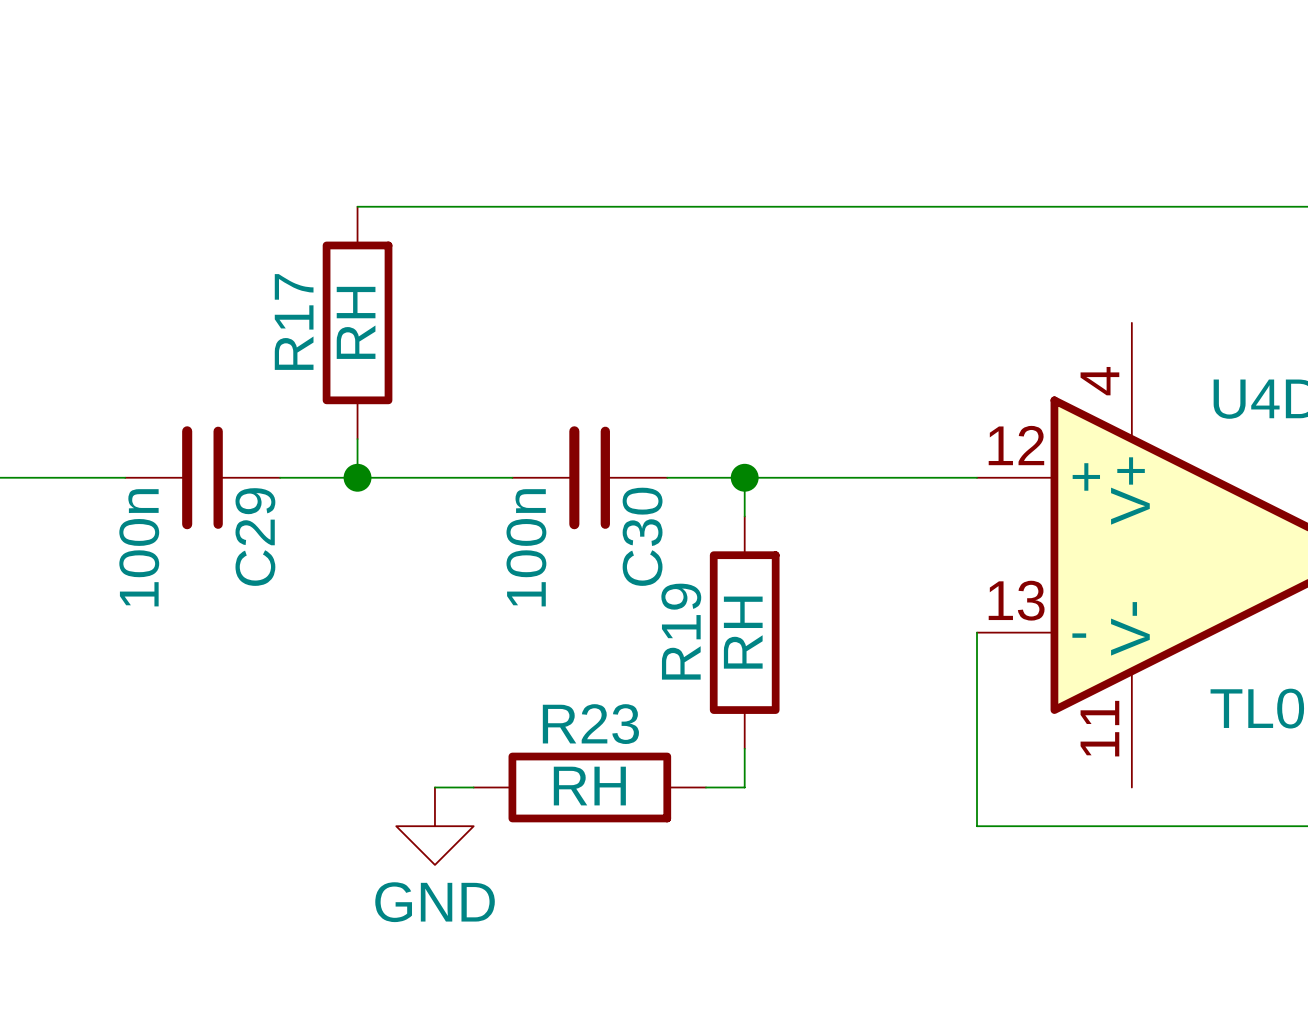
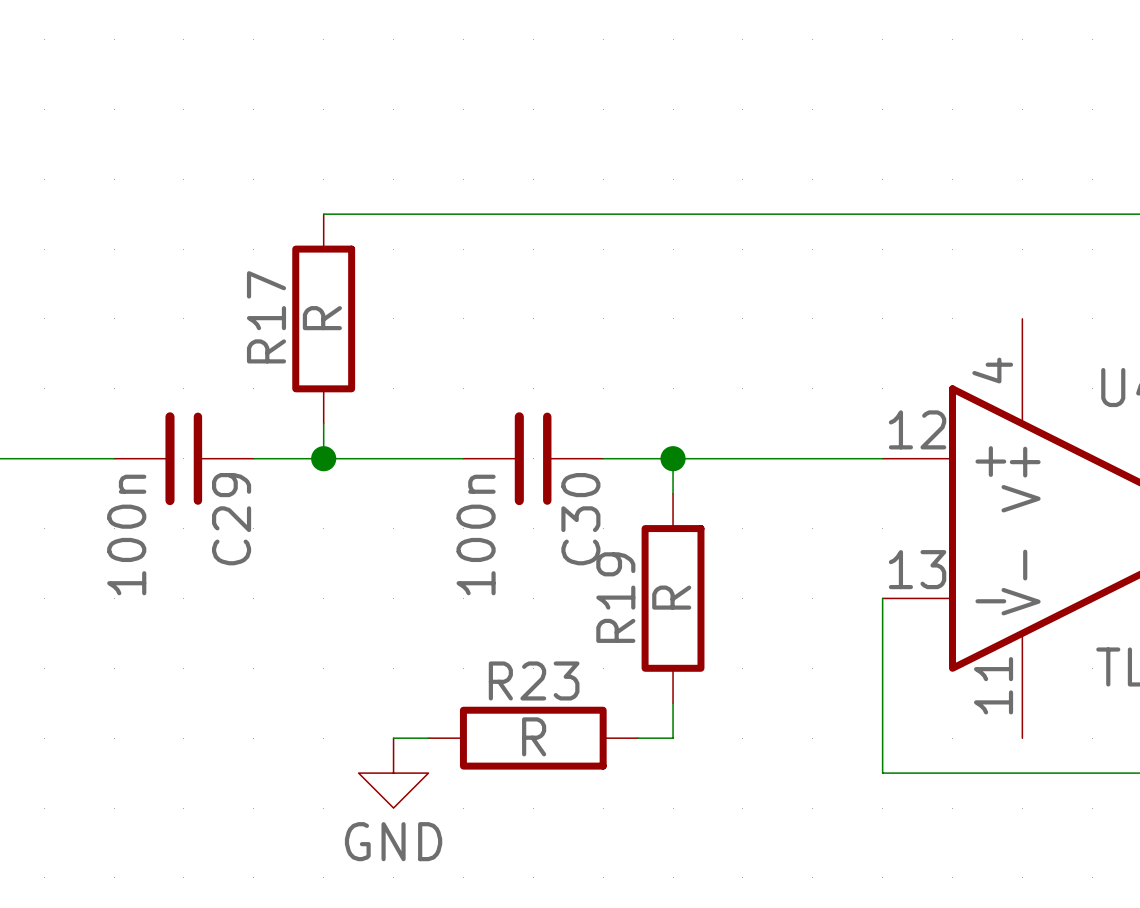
R17 value: RH (356, 322) -> R (322, 318)
R19 value: RH (743, 632) -> R (671, 597)
R23 value: RH (589, 786) -> R (534, 736)

